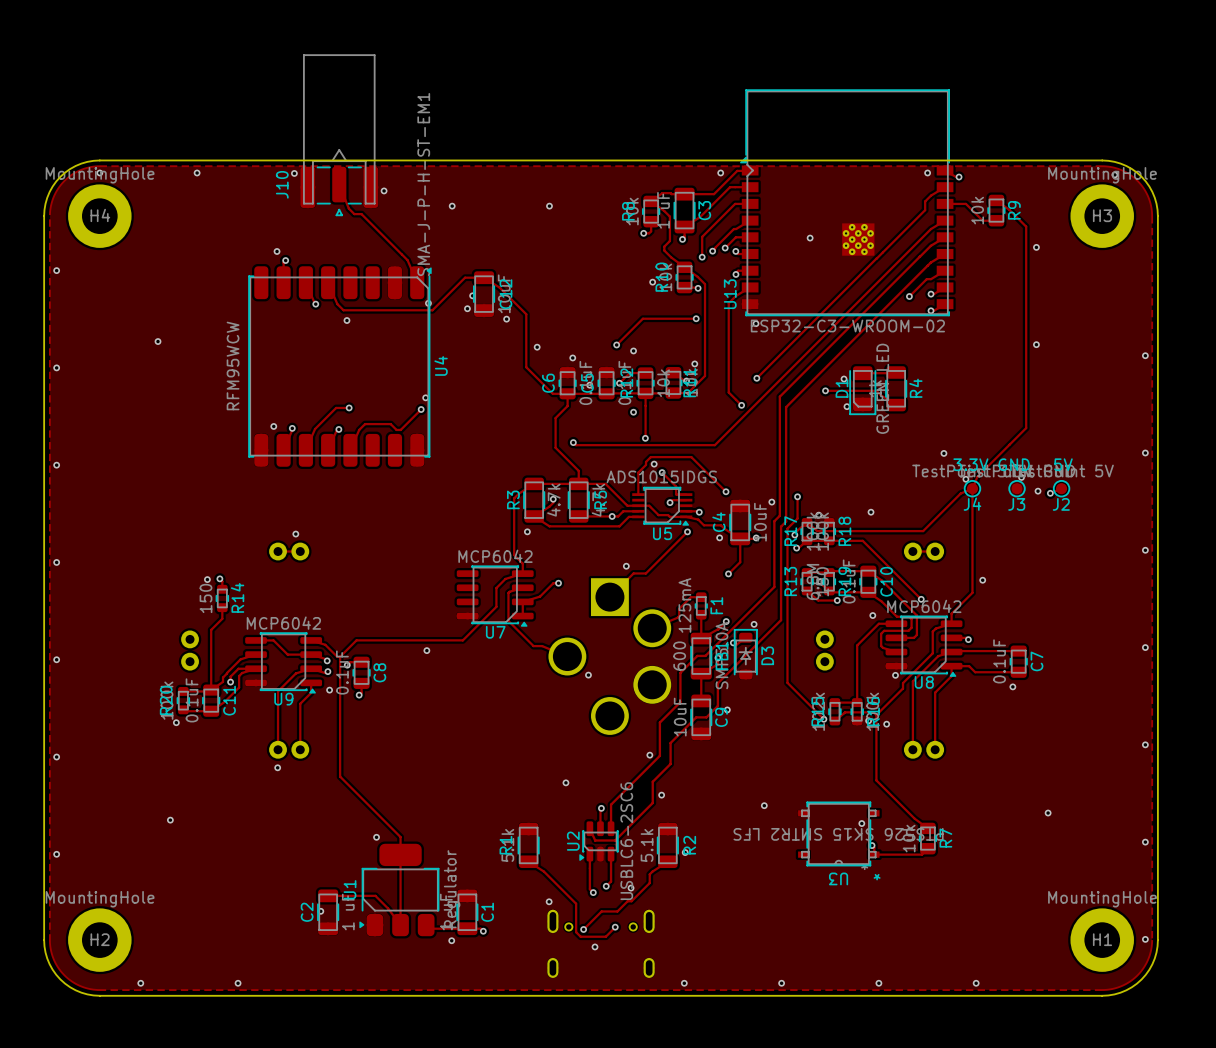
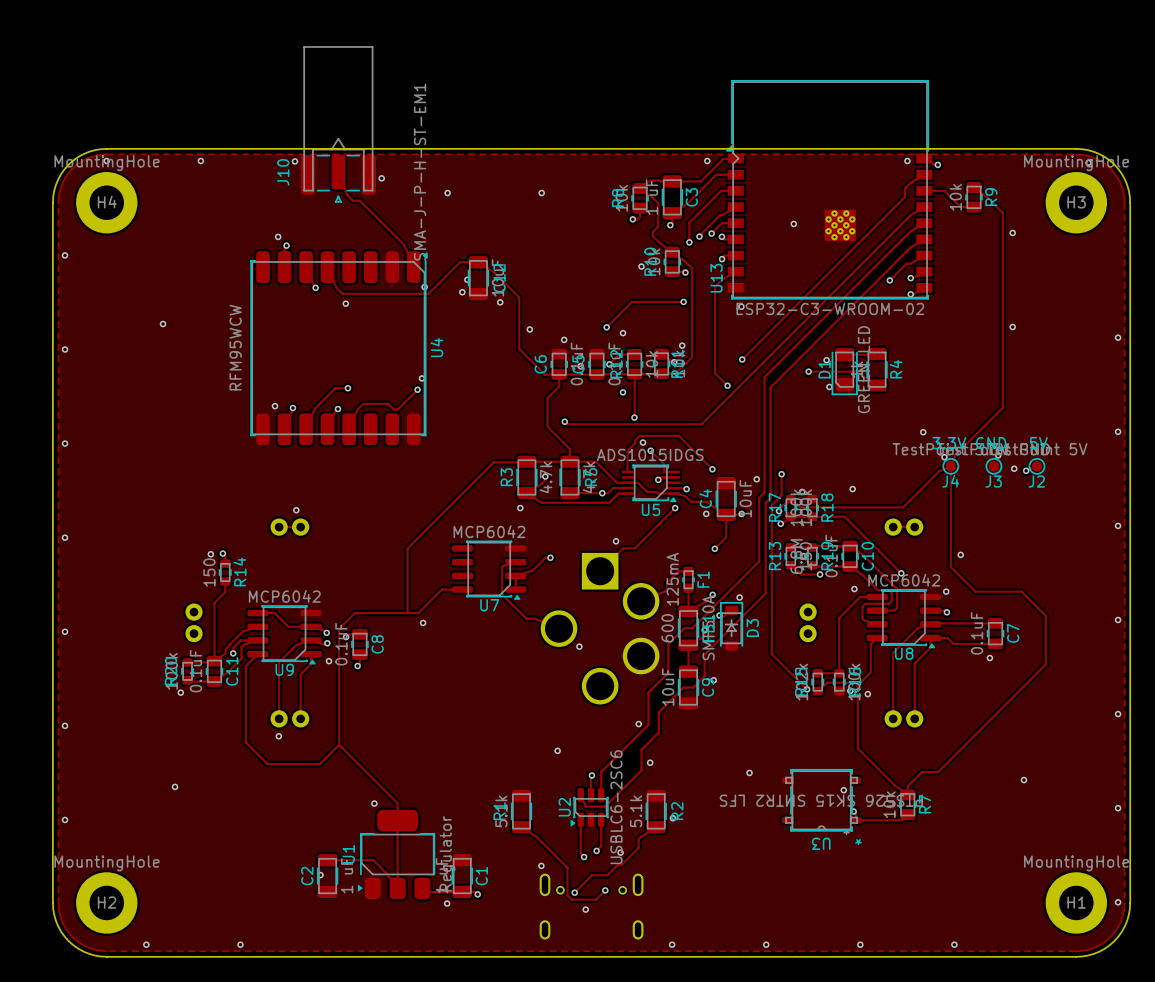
track: (534, 483) (514, 498) (514, 554) (522, 563) (522, 573) (505, 578) (496, 588) (496, 606) (462, 640) (422, 640) -> (526, 461) (493, 462) (407, 548) (407, 613)
track: (972, 592) (951, 613) (951, 623) (935, 628) (932, 631) (932, 653) (903, 683) (903, 688) (889, 701) -> (877, 638) (870, 644) (870, 672)
track: none -> (950, 567) (975, 591) (1021, 591) (1045, 615) (1045, 664) (938, 772) (921, 772) (907, 786) (907, 794)
track: none -> (462, 589) (442, 589) (418, 613)
via: none -> (946, 591)
track: (311, 640) (325, 644) (337, 656) (340, 656) -> none
via: (895, 675) -> none
track: none -> (257, 654) (245, 666) (245, 742) (267, 764) (320, 764) (339, 744)

